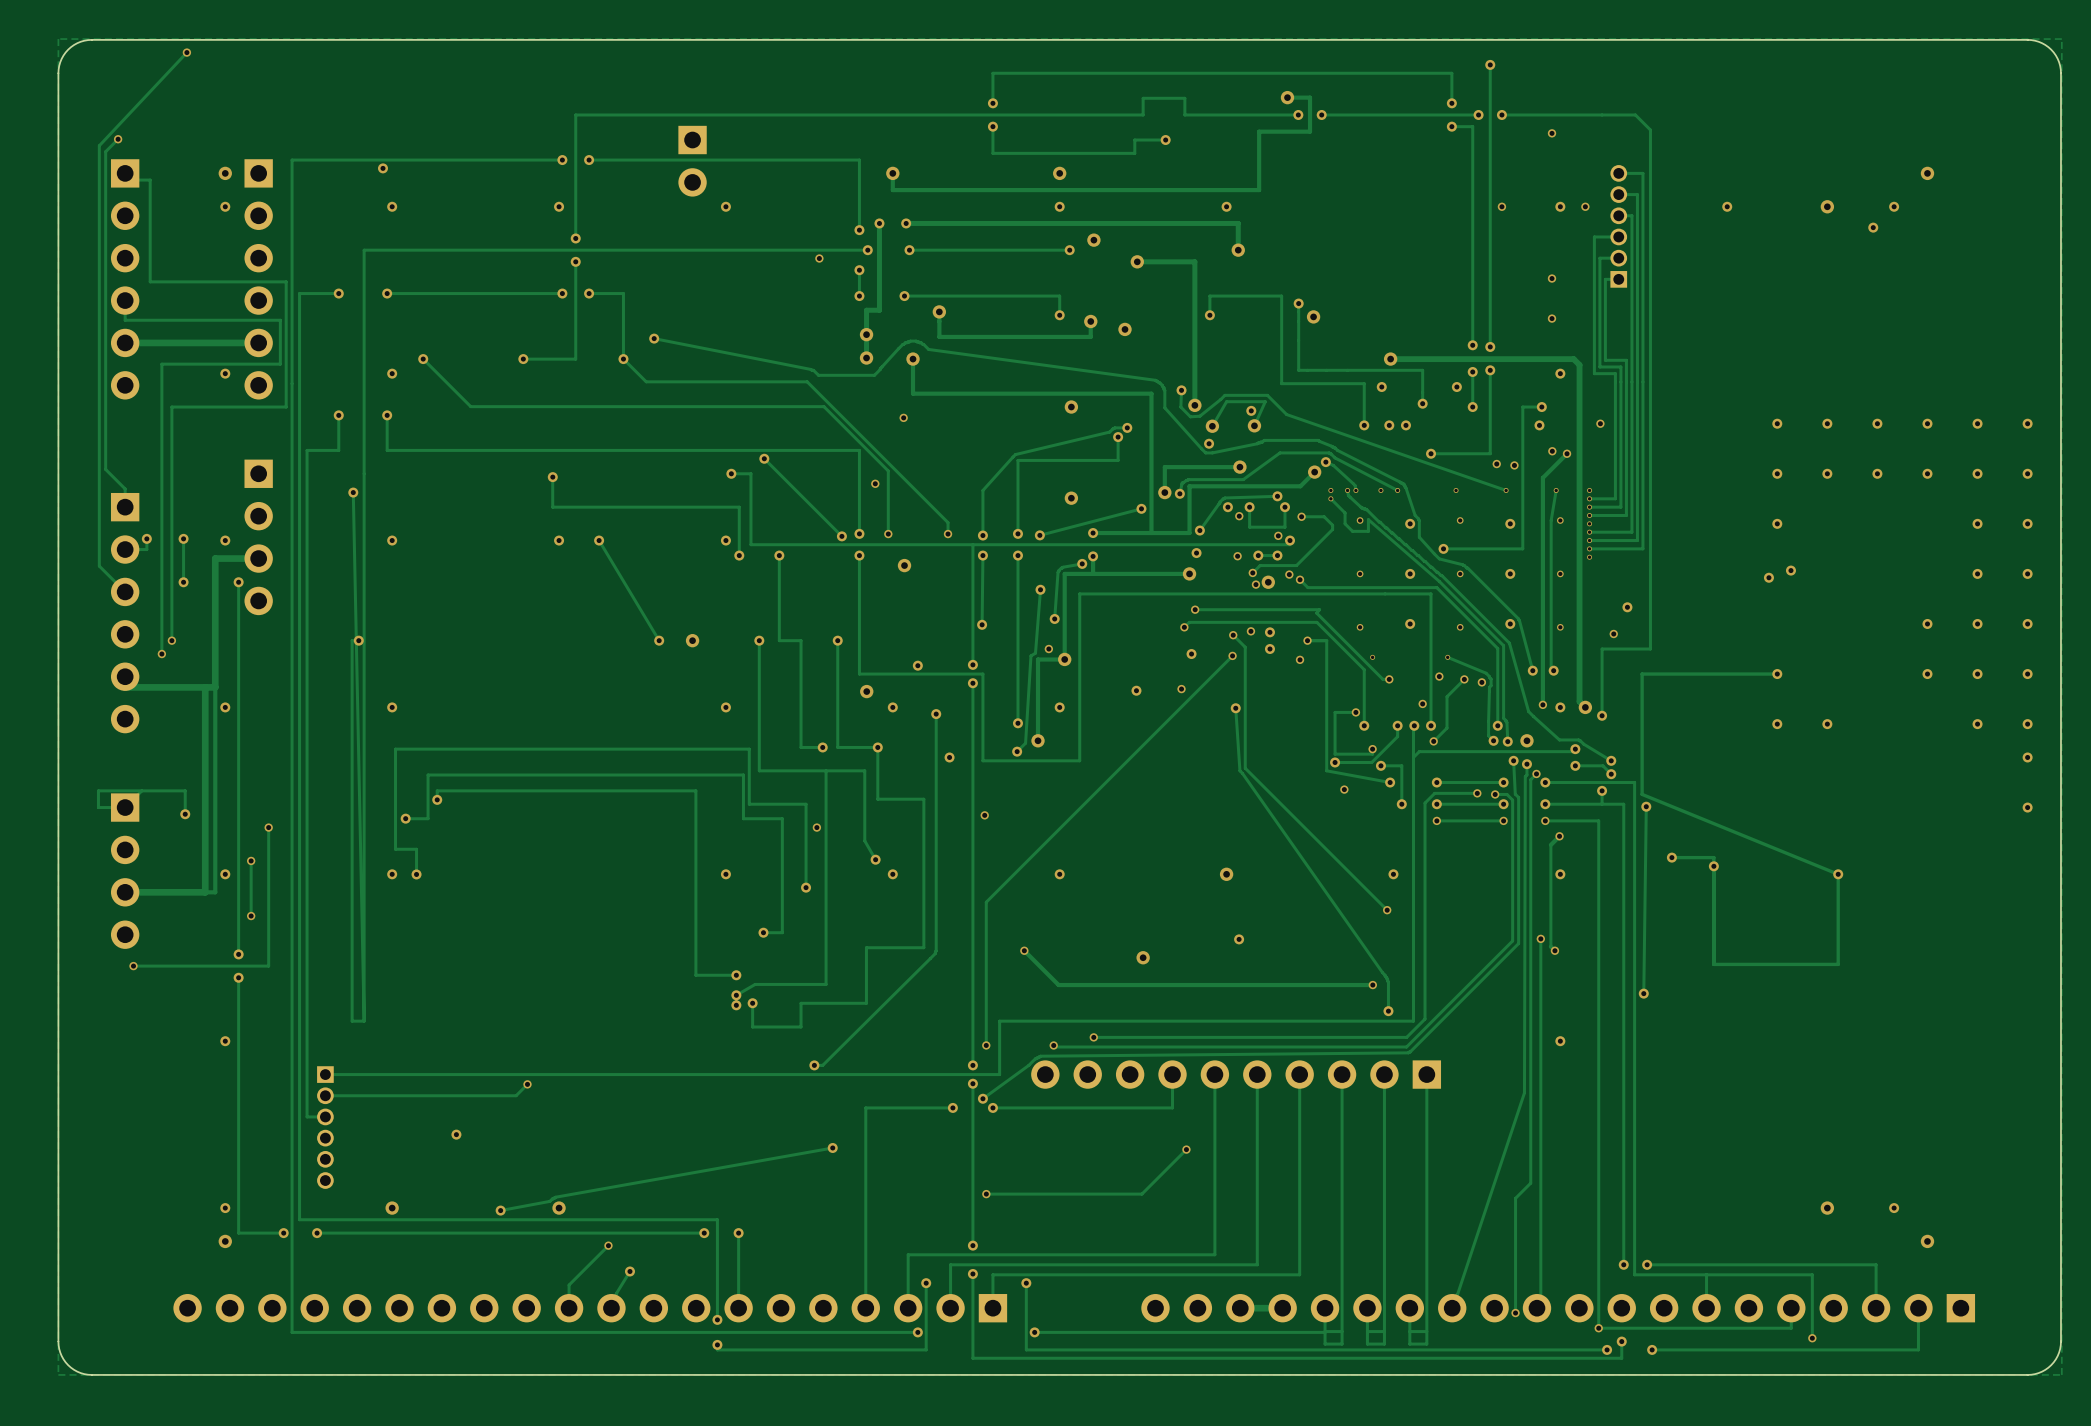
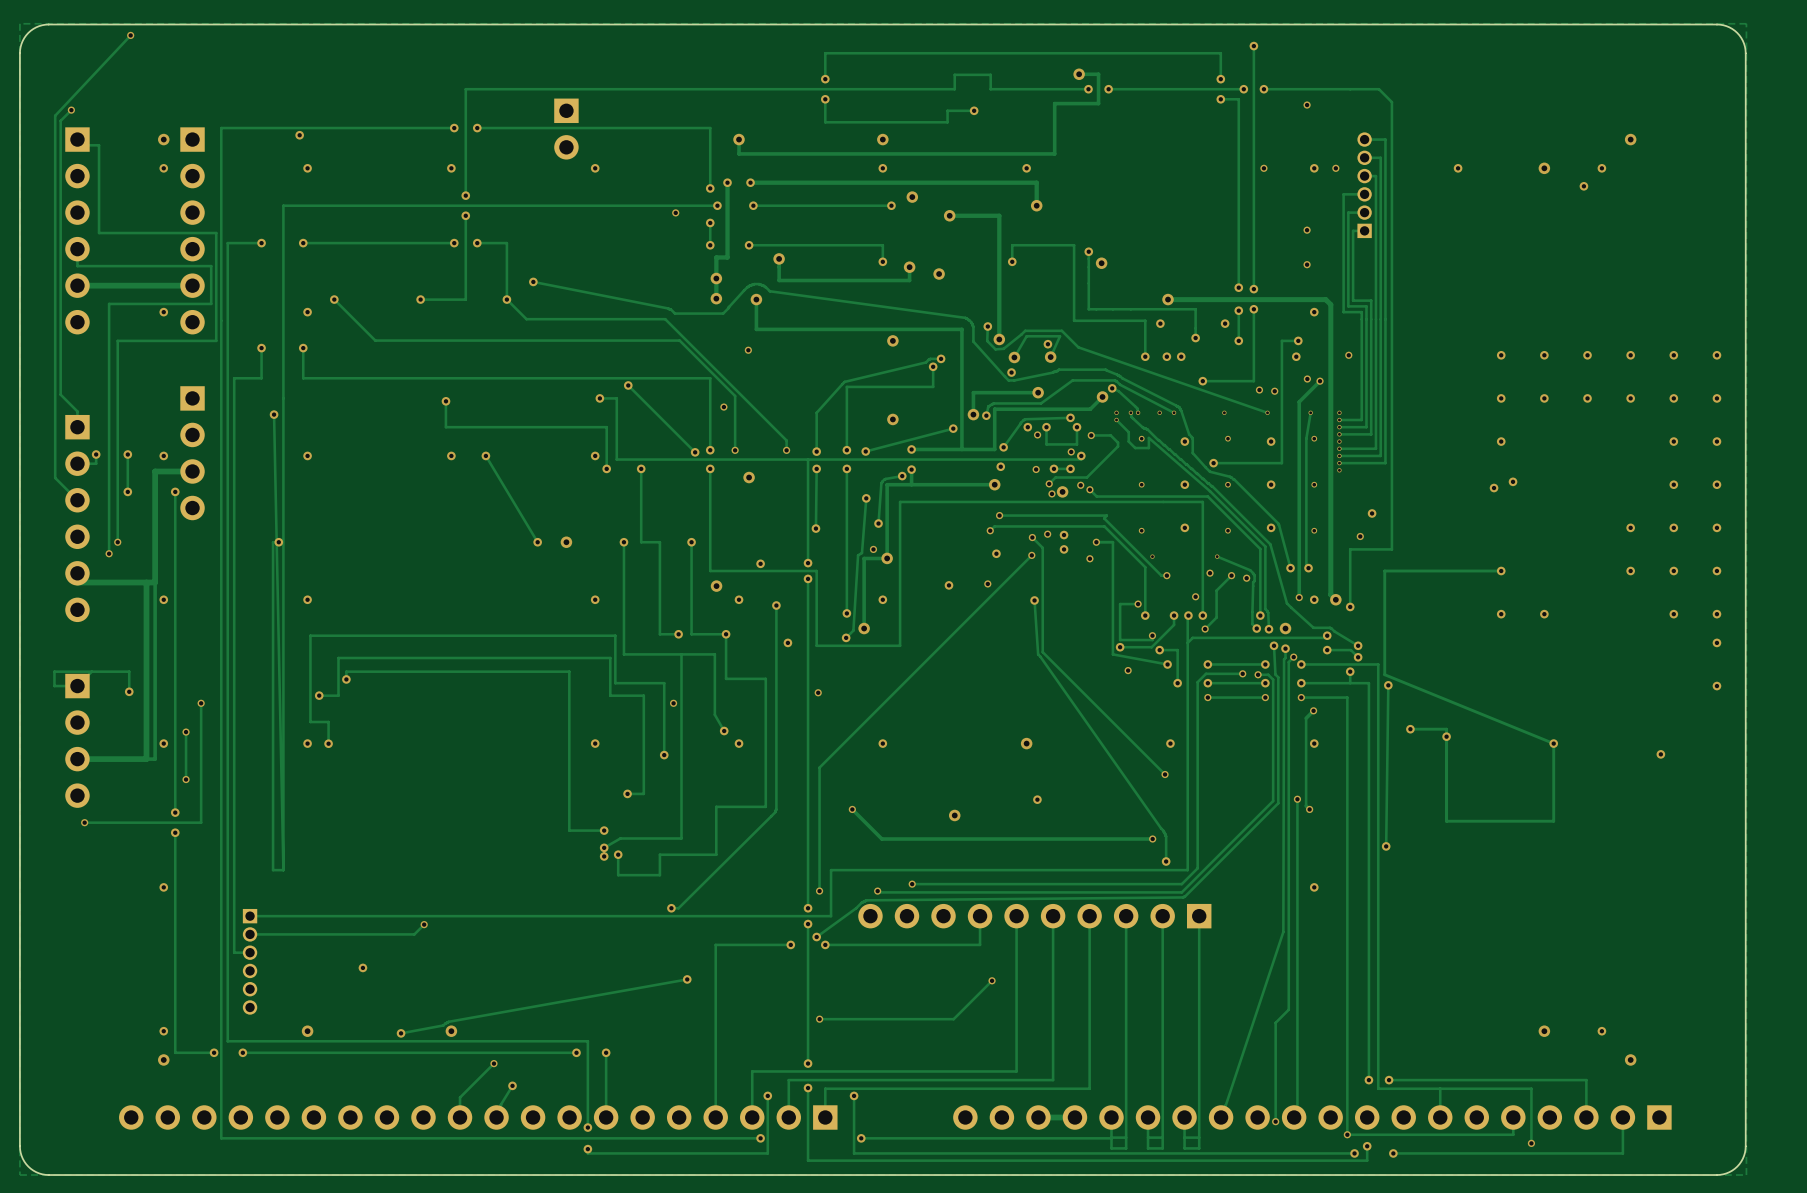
via: none -> (1660, 754)

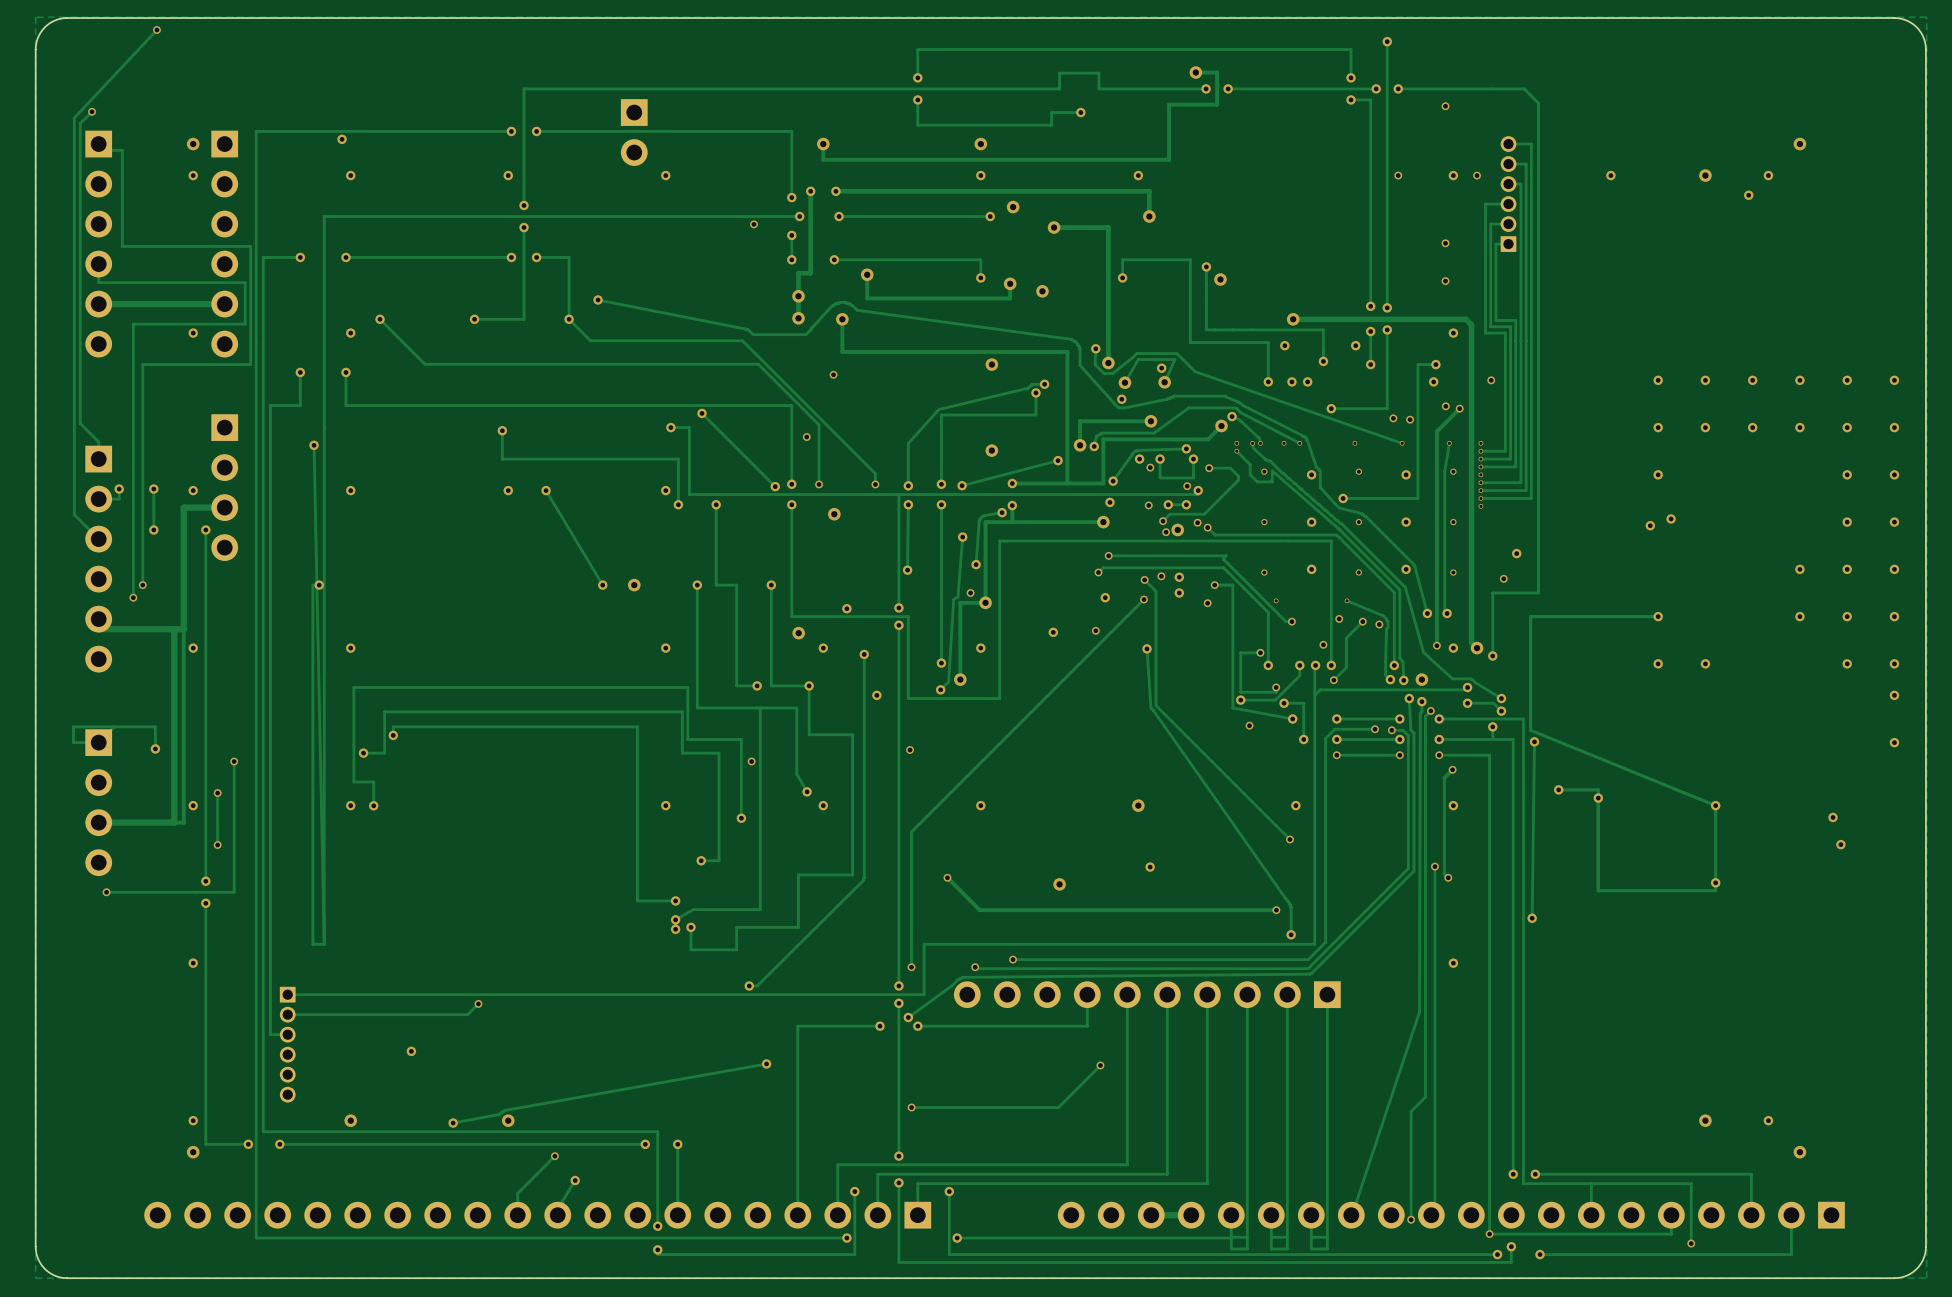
via: none -> (1840, 844)
via: none -> (1715, 882)

